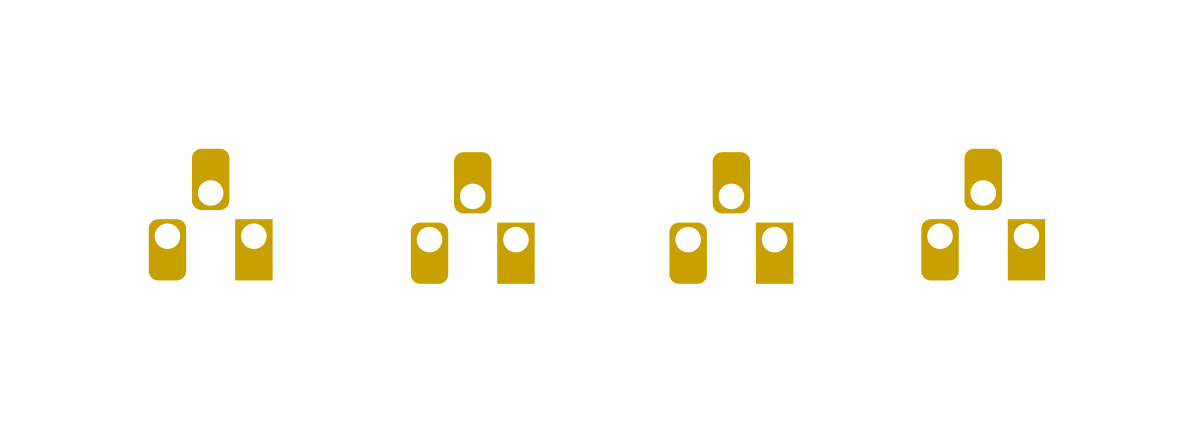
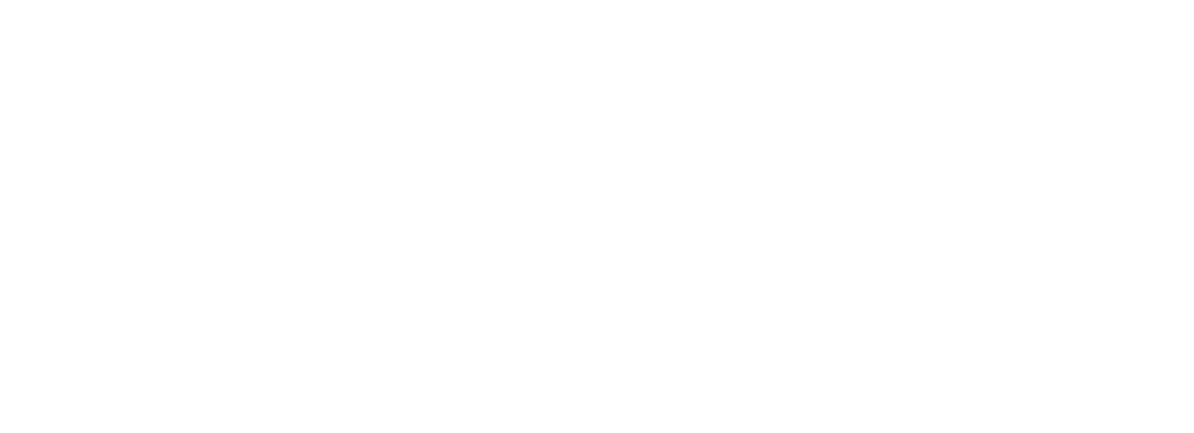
part: (210, 214) -> none
part: (983, 214) -> none
part: (472, 217) -> none
part: (731, 217) -> none

